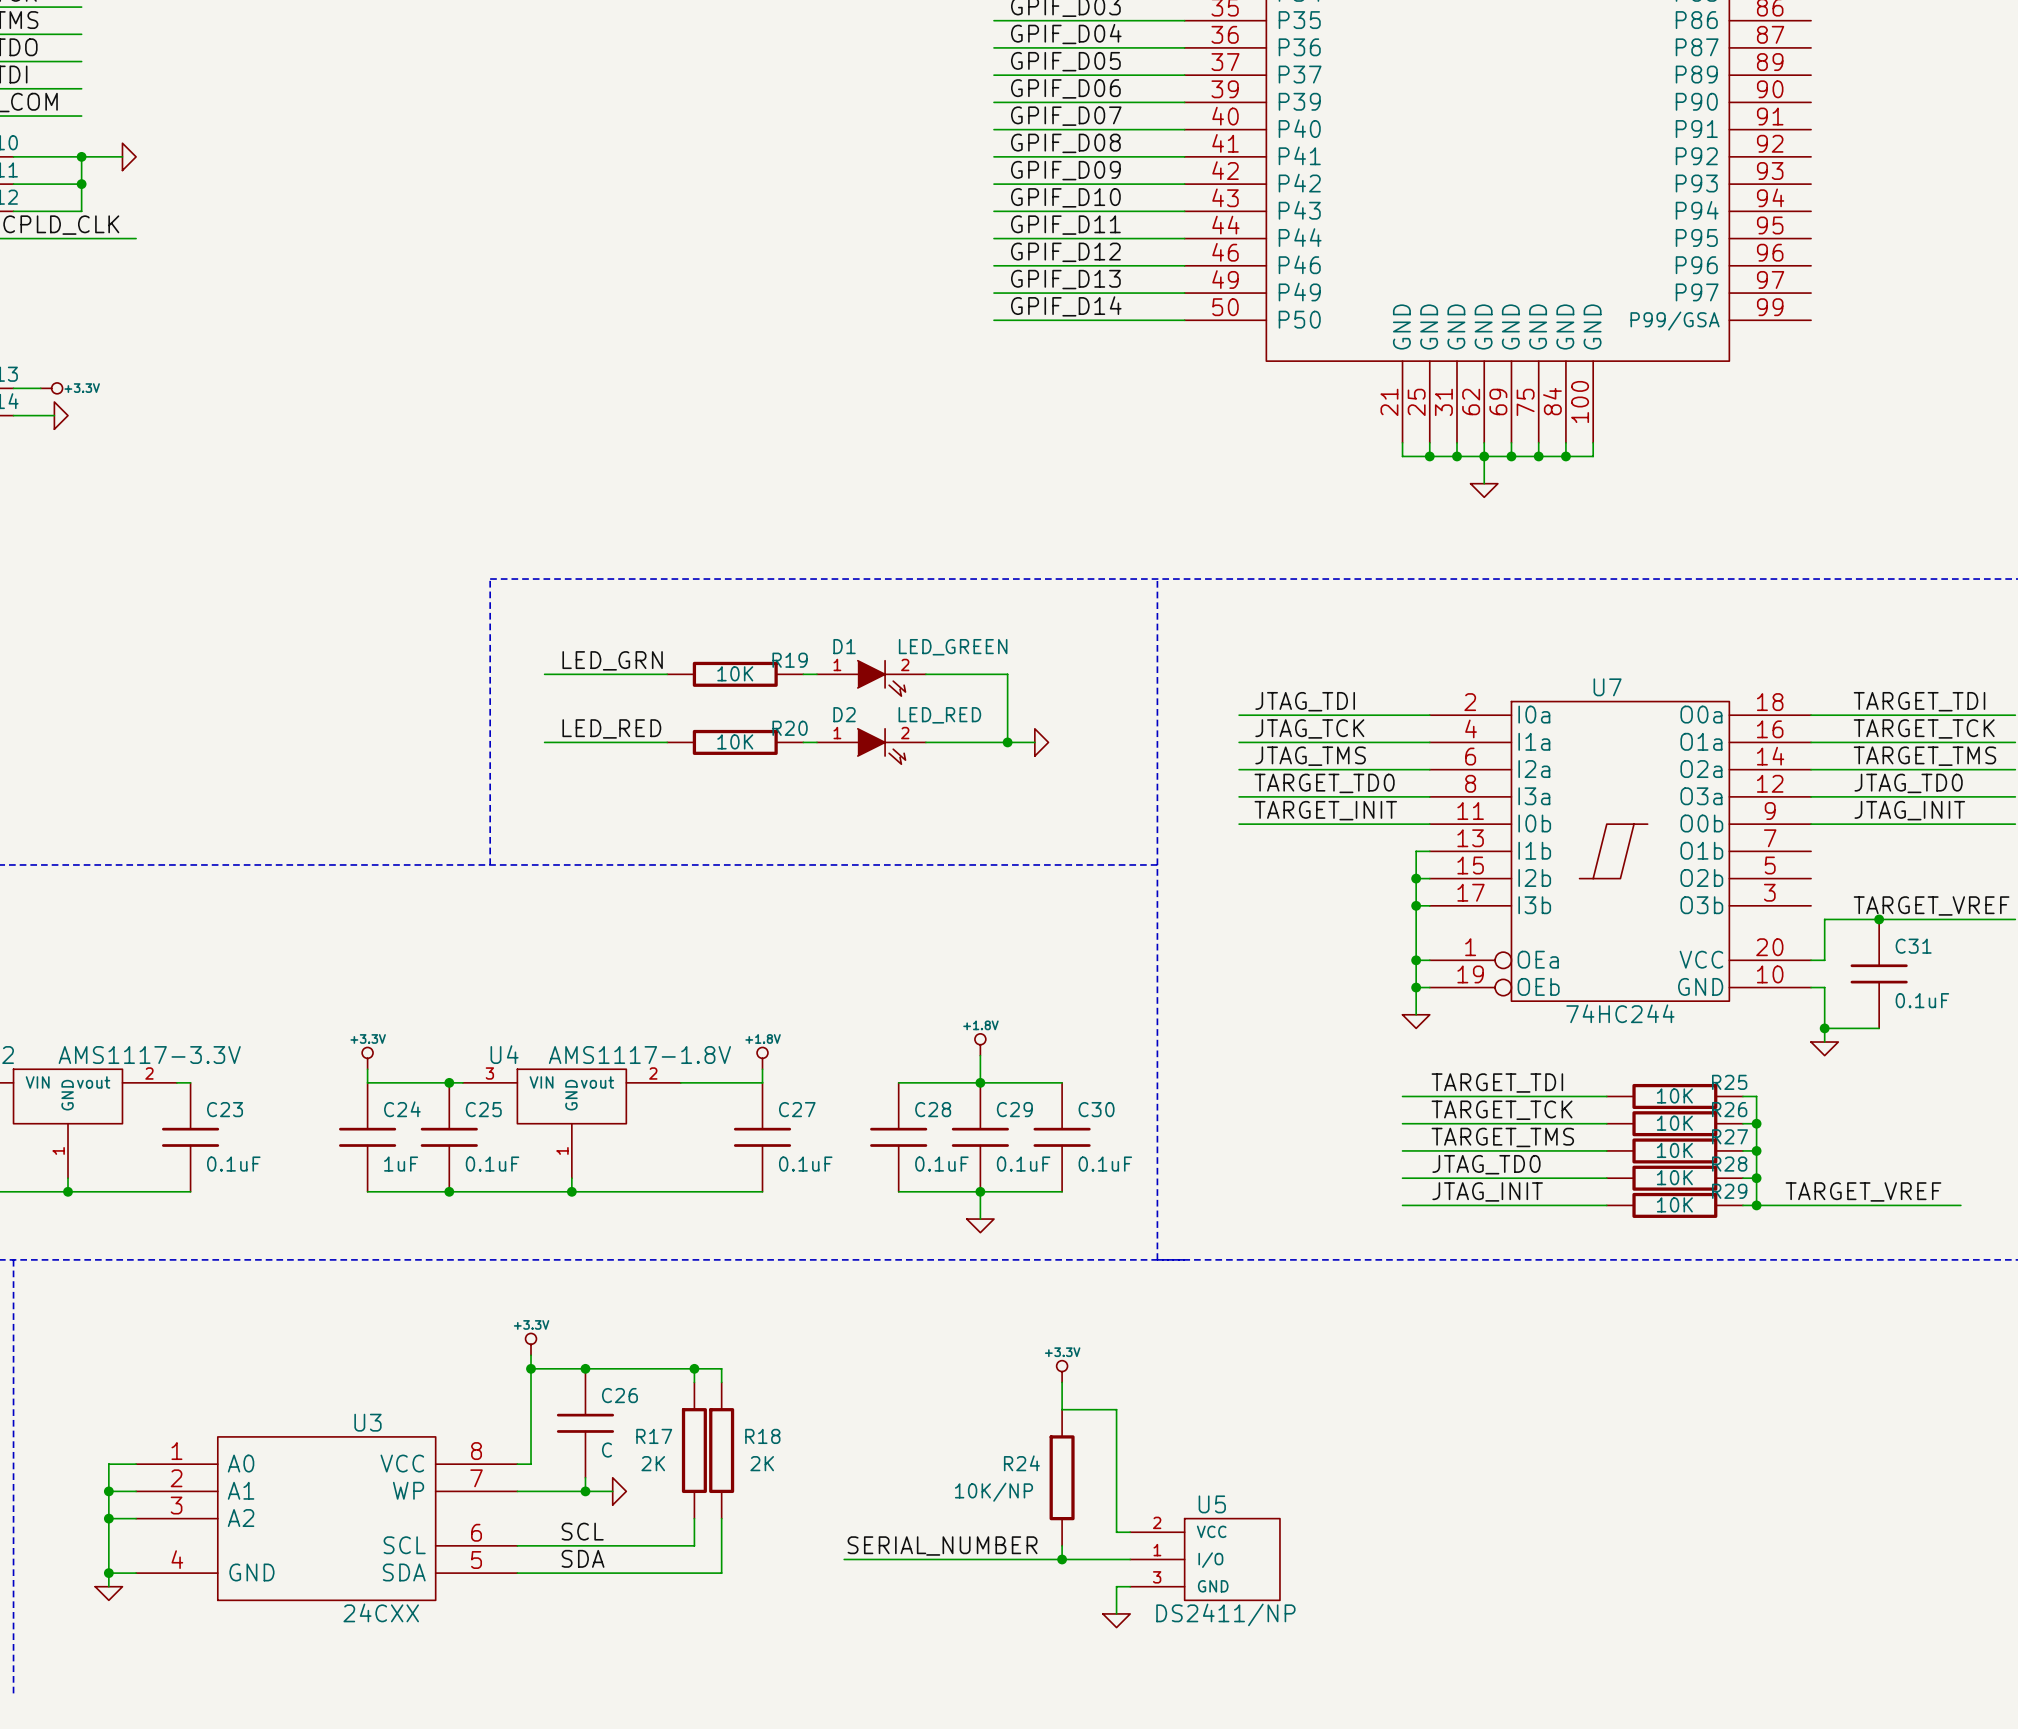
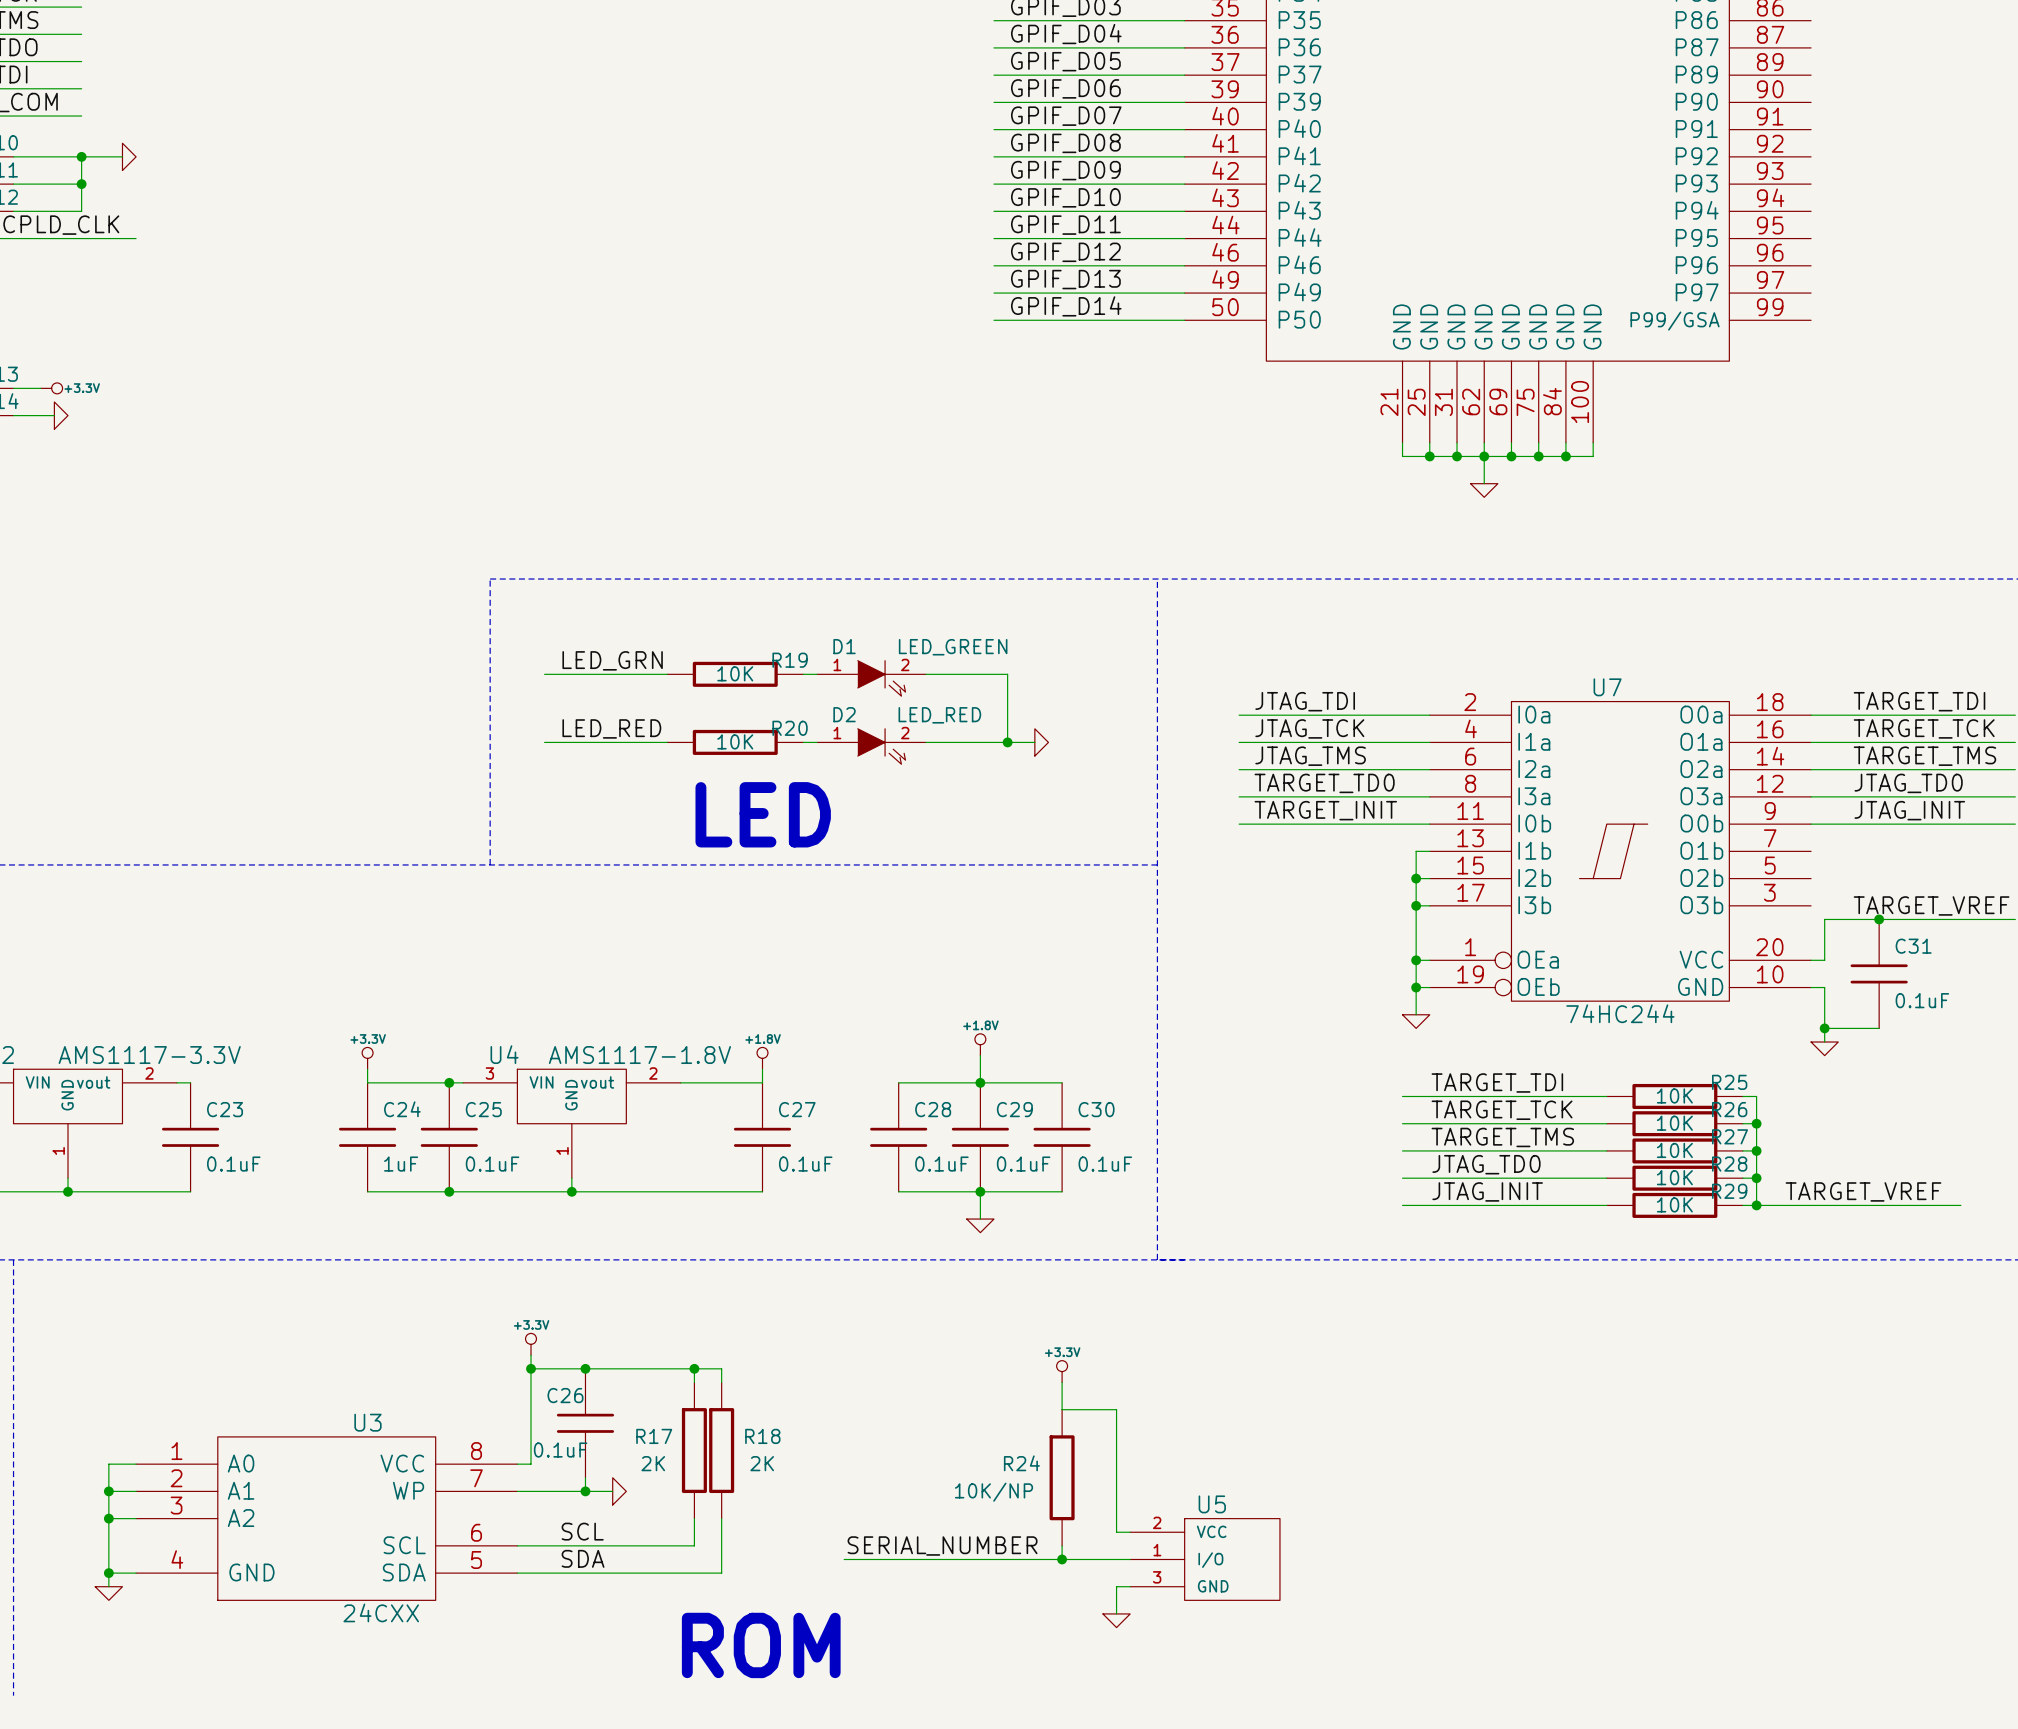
text: none -> LED (763, 814)
C26 name position: C26 (619, 1395) -> C26 (565, 1395)
C26 value: C (606, 1450) -> 0.1uF (560, 1450)
U5 value: DS2411/NP (1225, 1614) -> none
text: none -> ROM (761, 1645)

